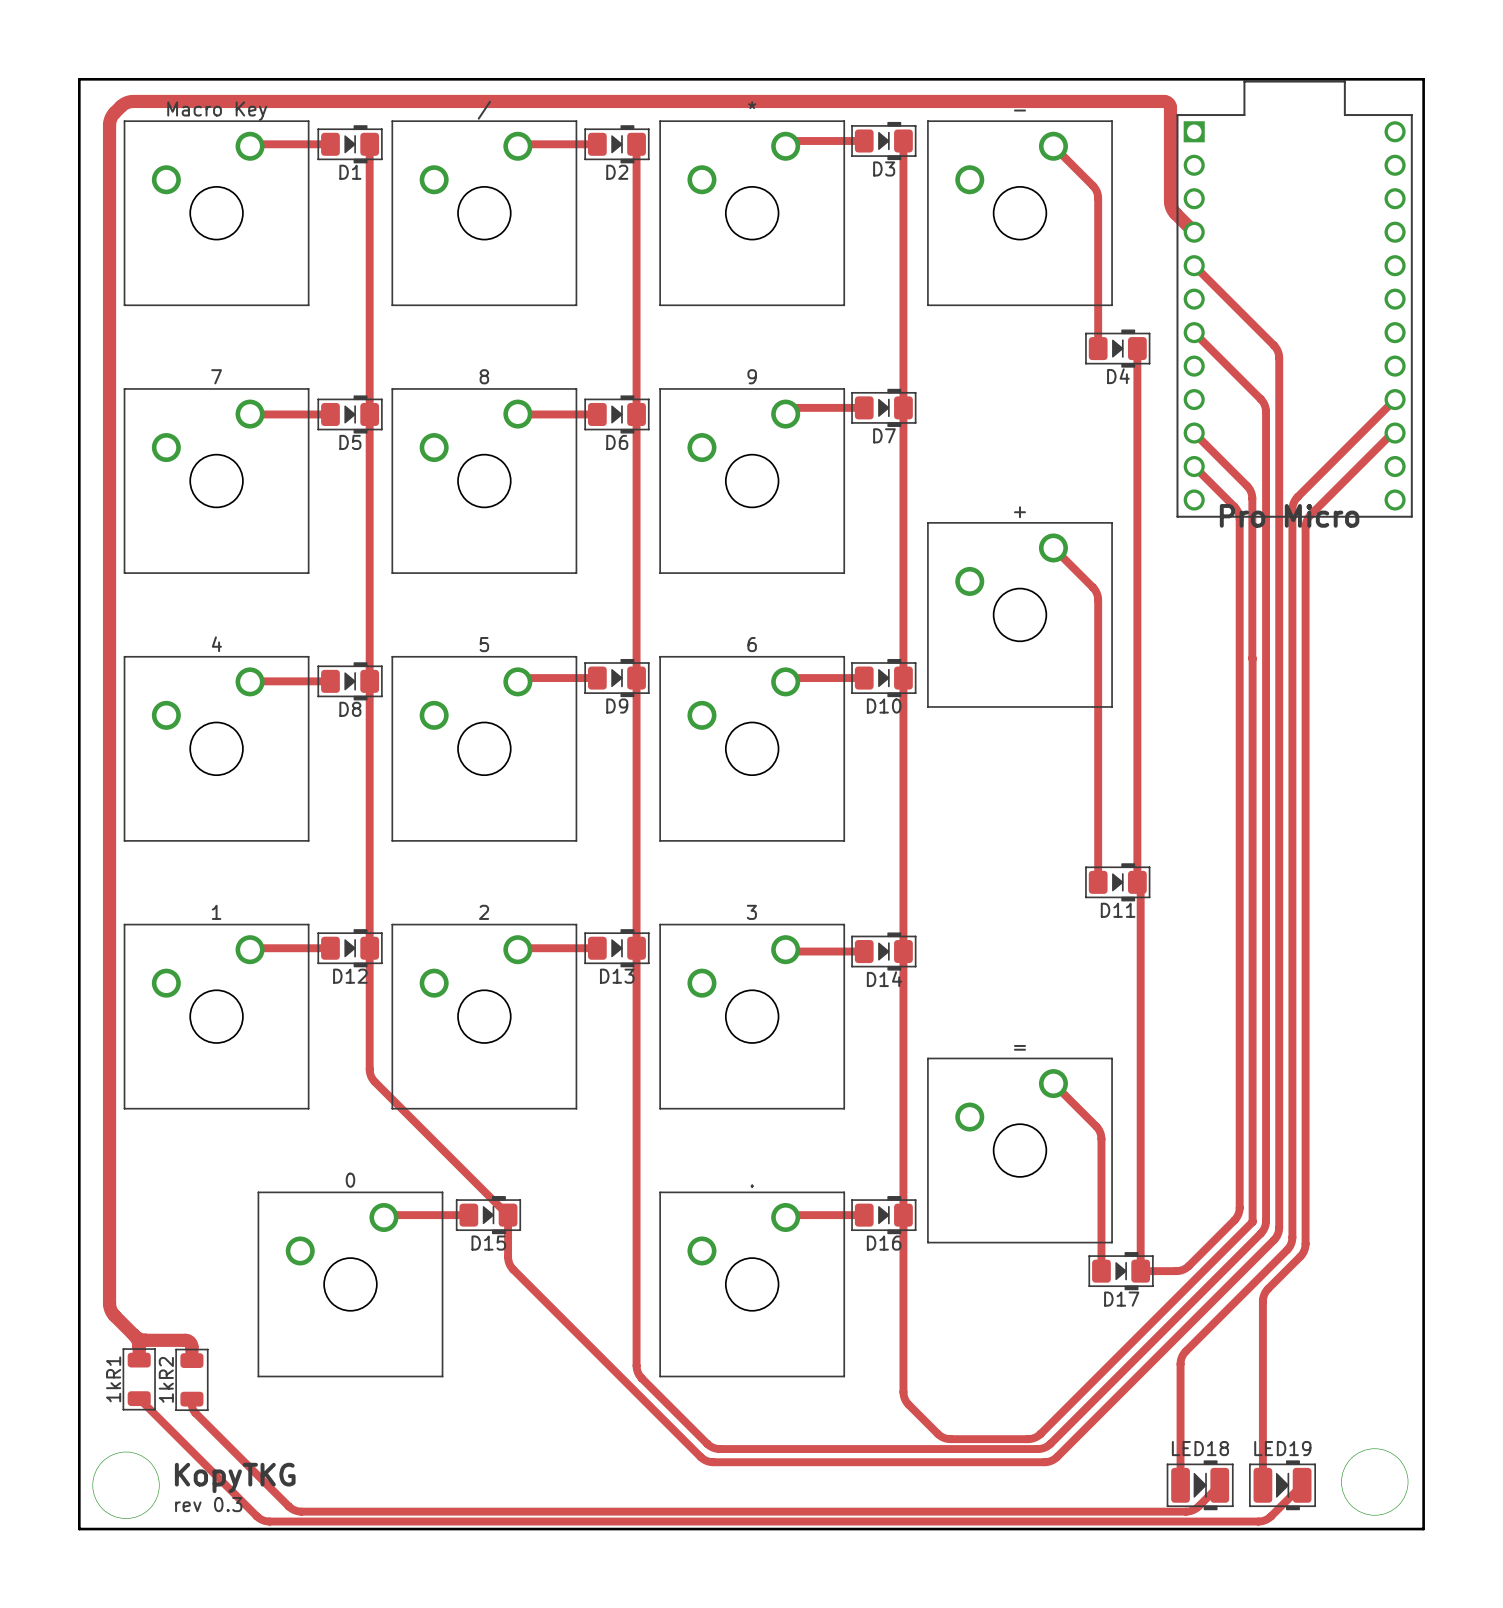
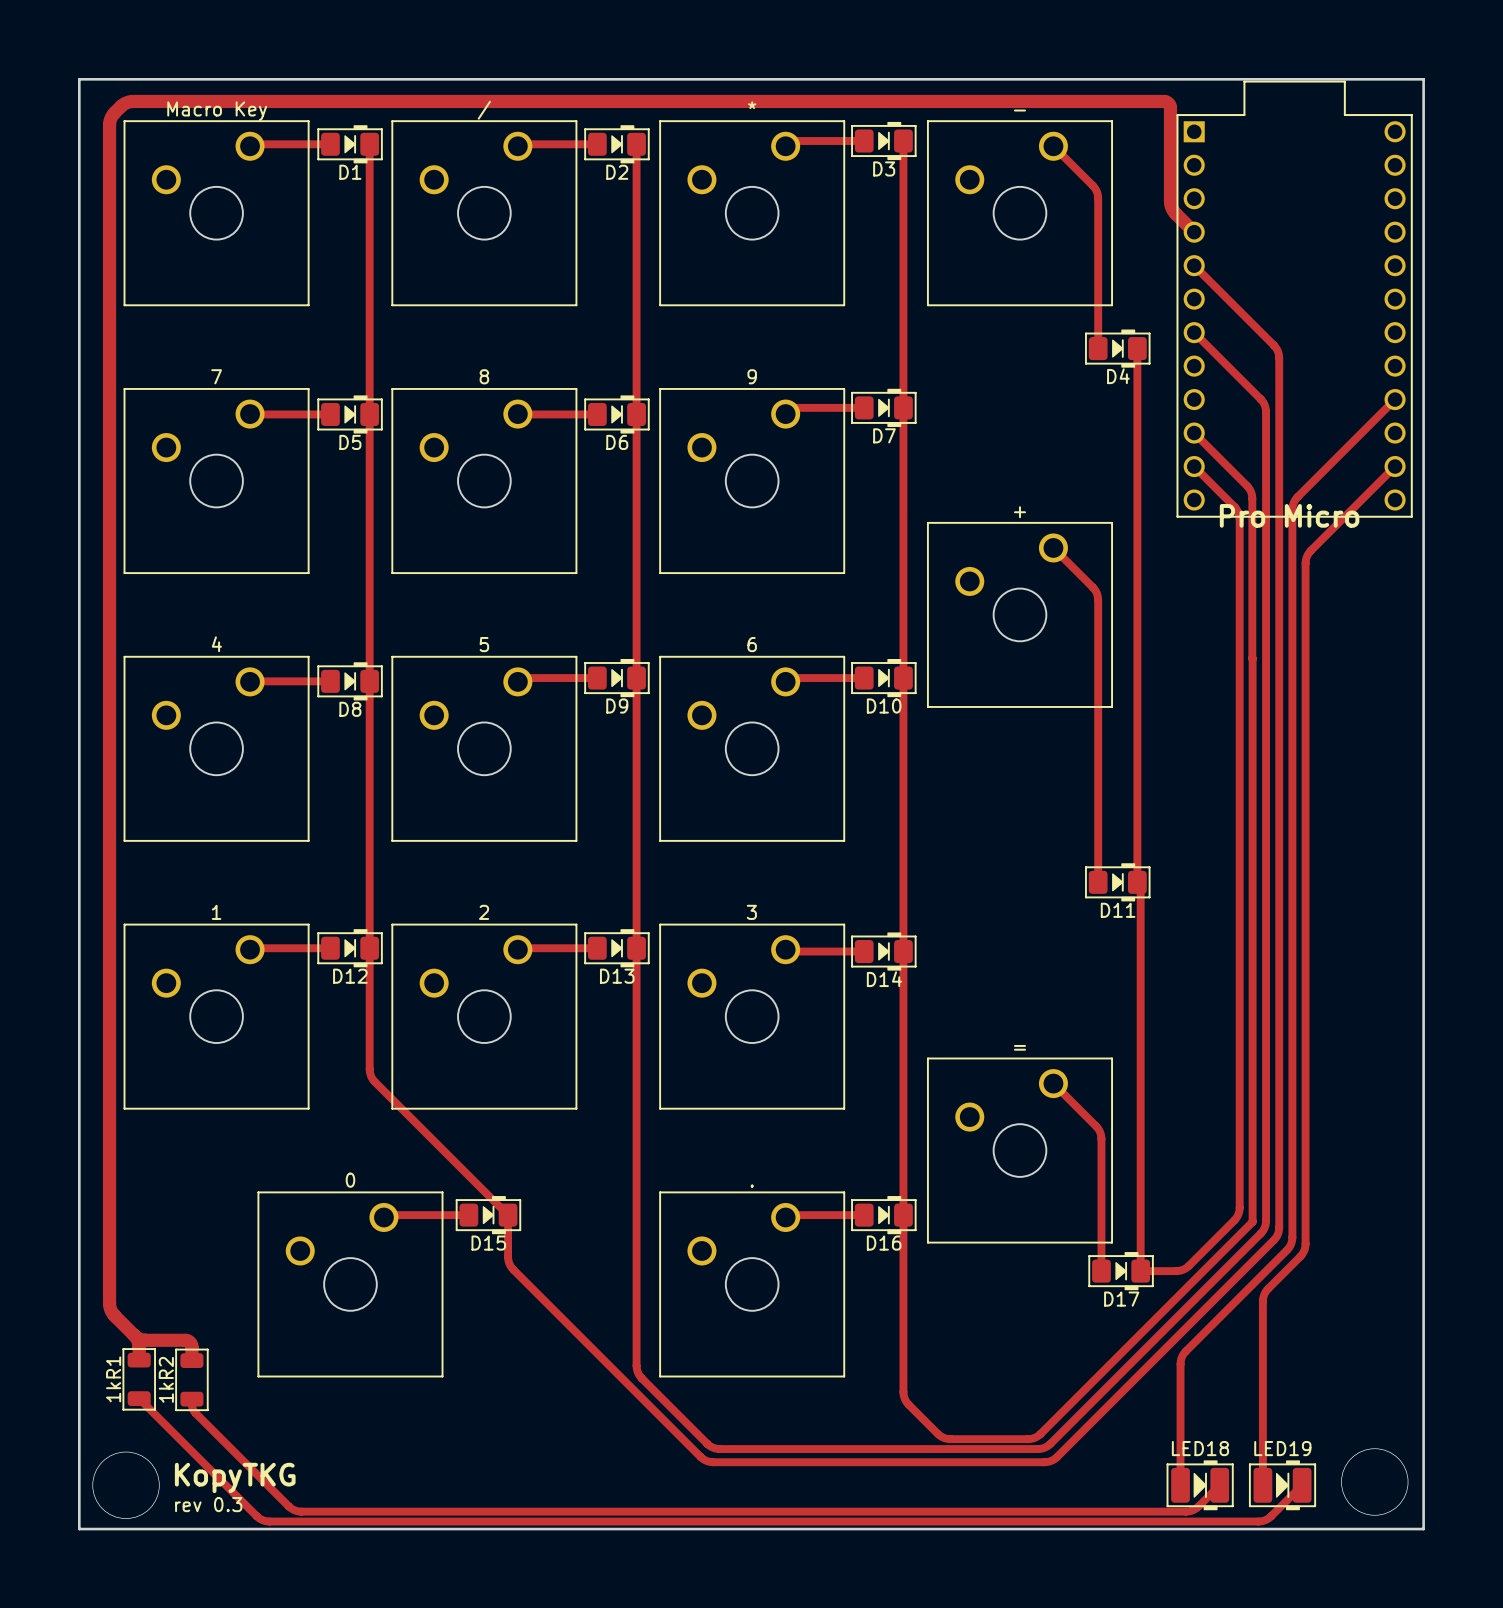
track: (1391, 433) (1308, 517) (1305, 525) (1305, 563) -> (1395, 466) (1310, 550) (1305, 563)

